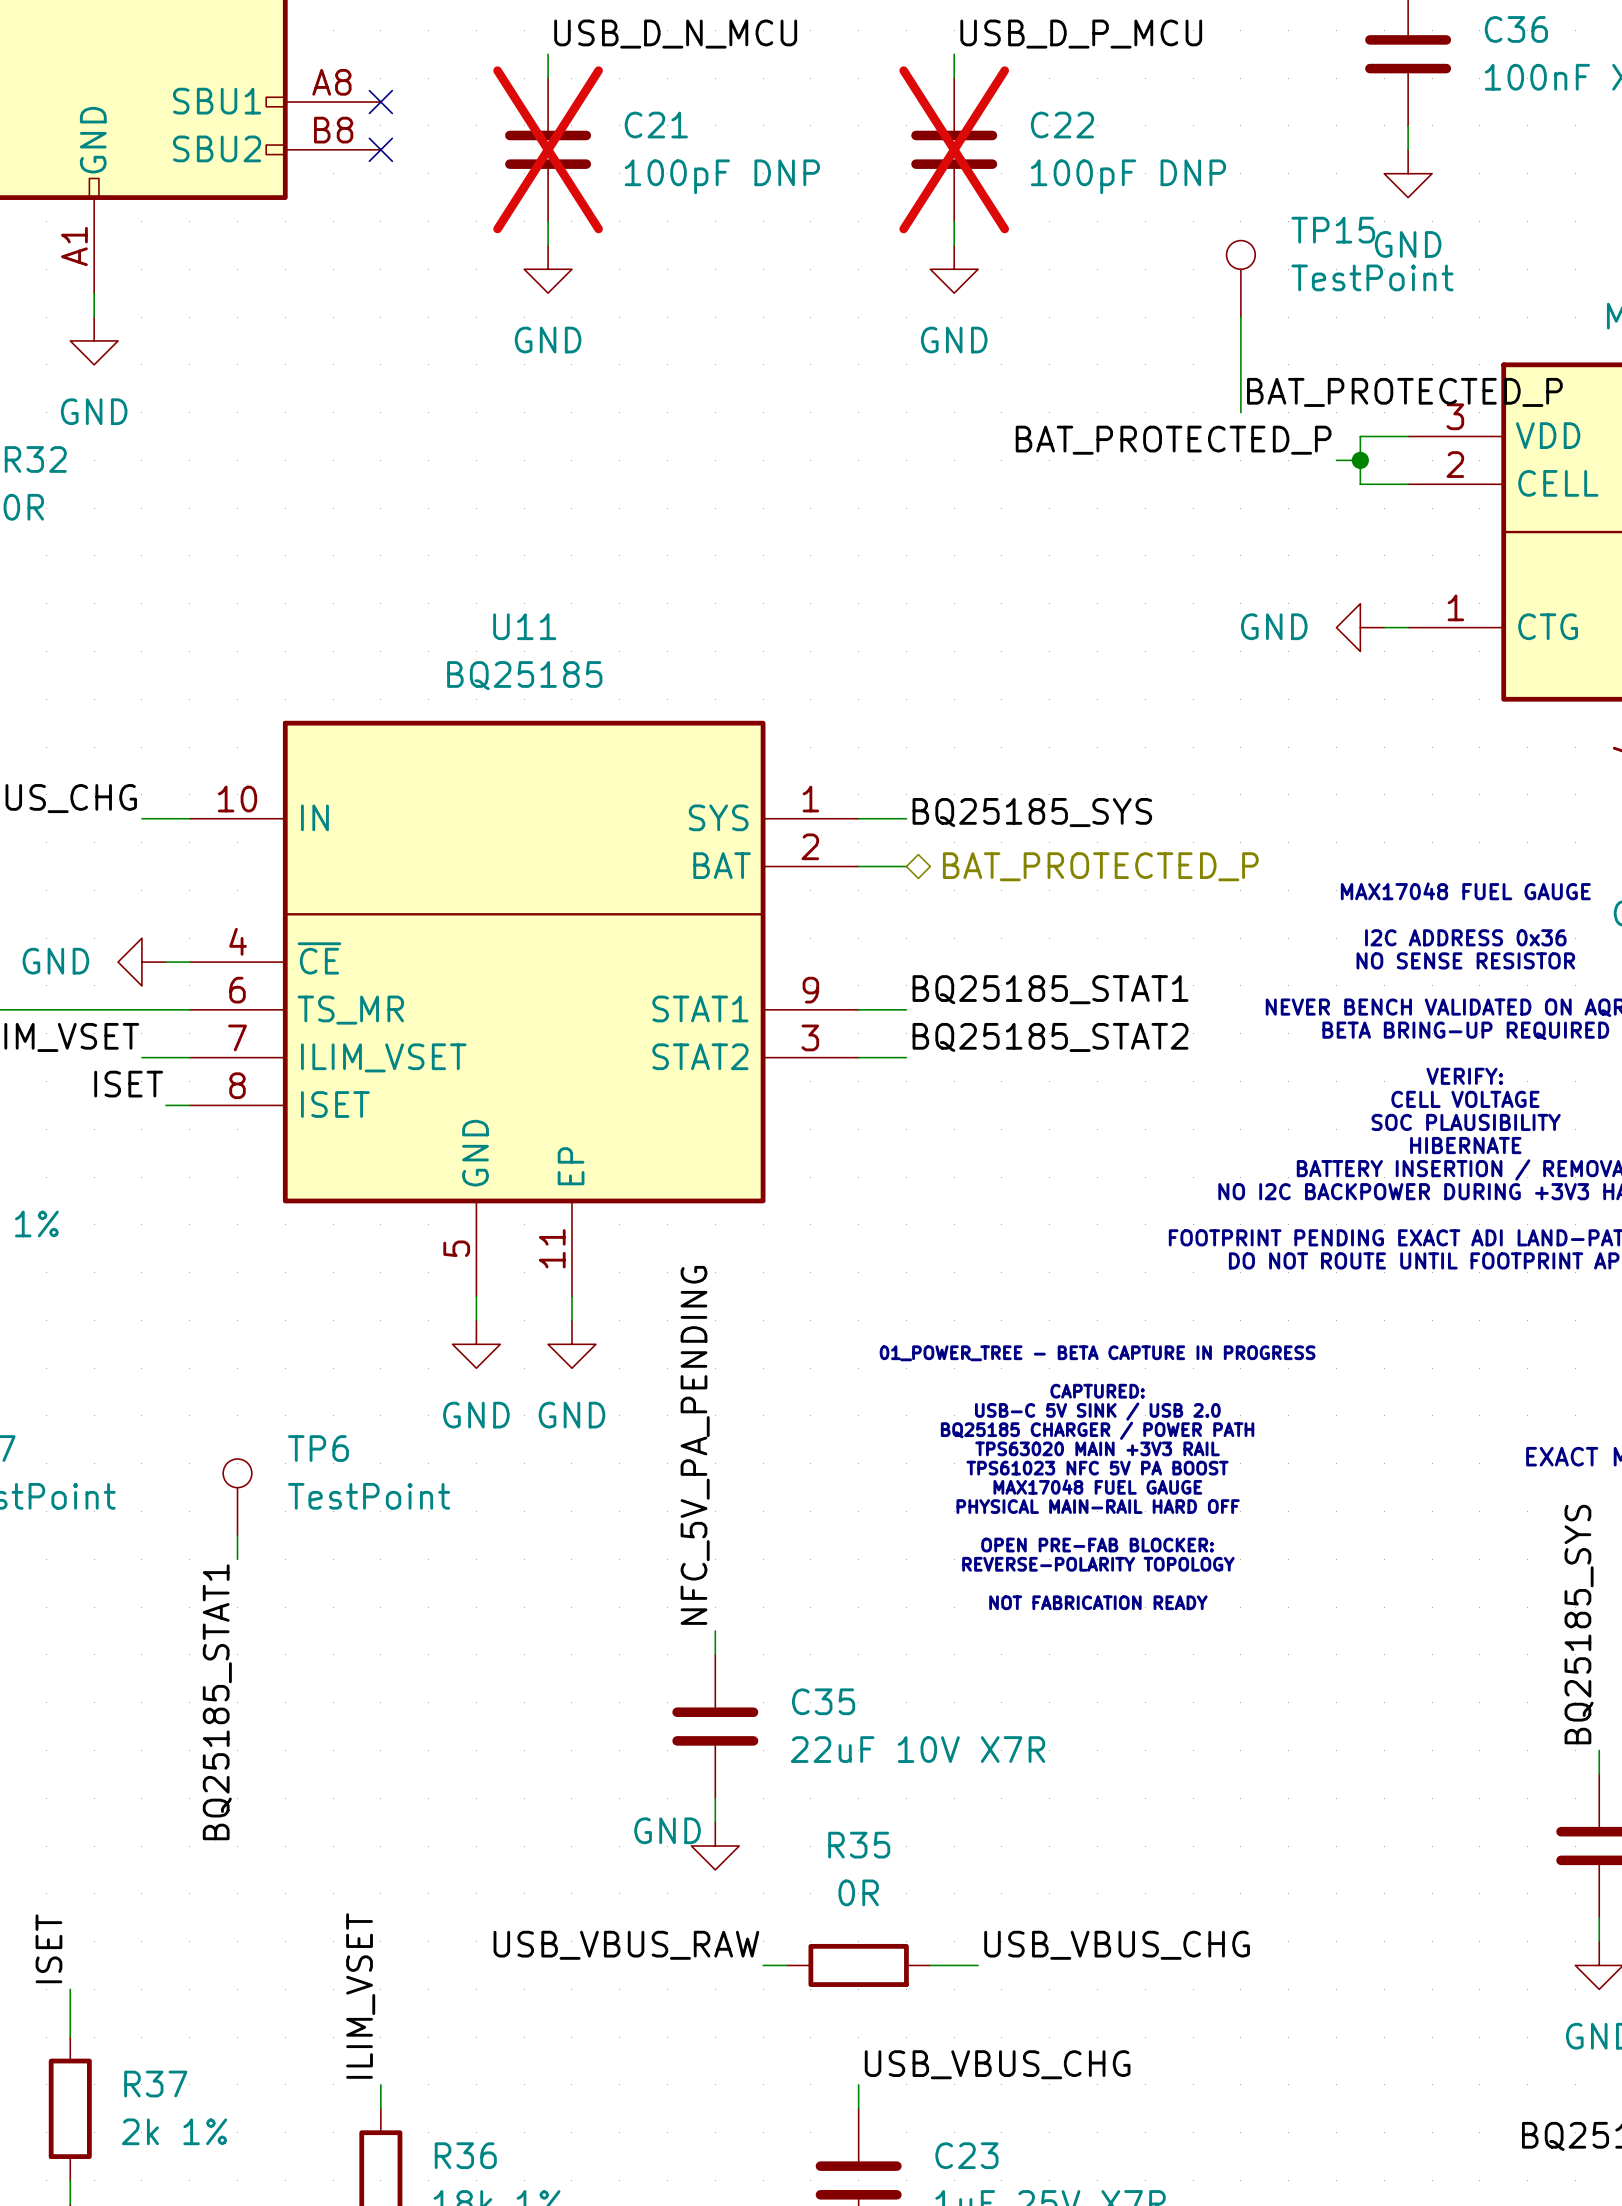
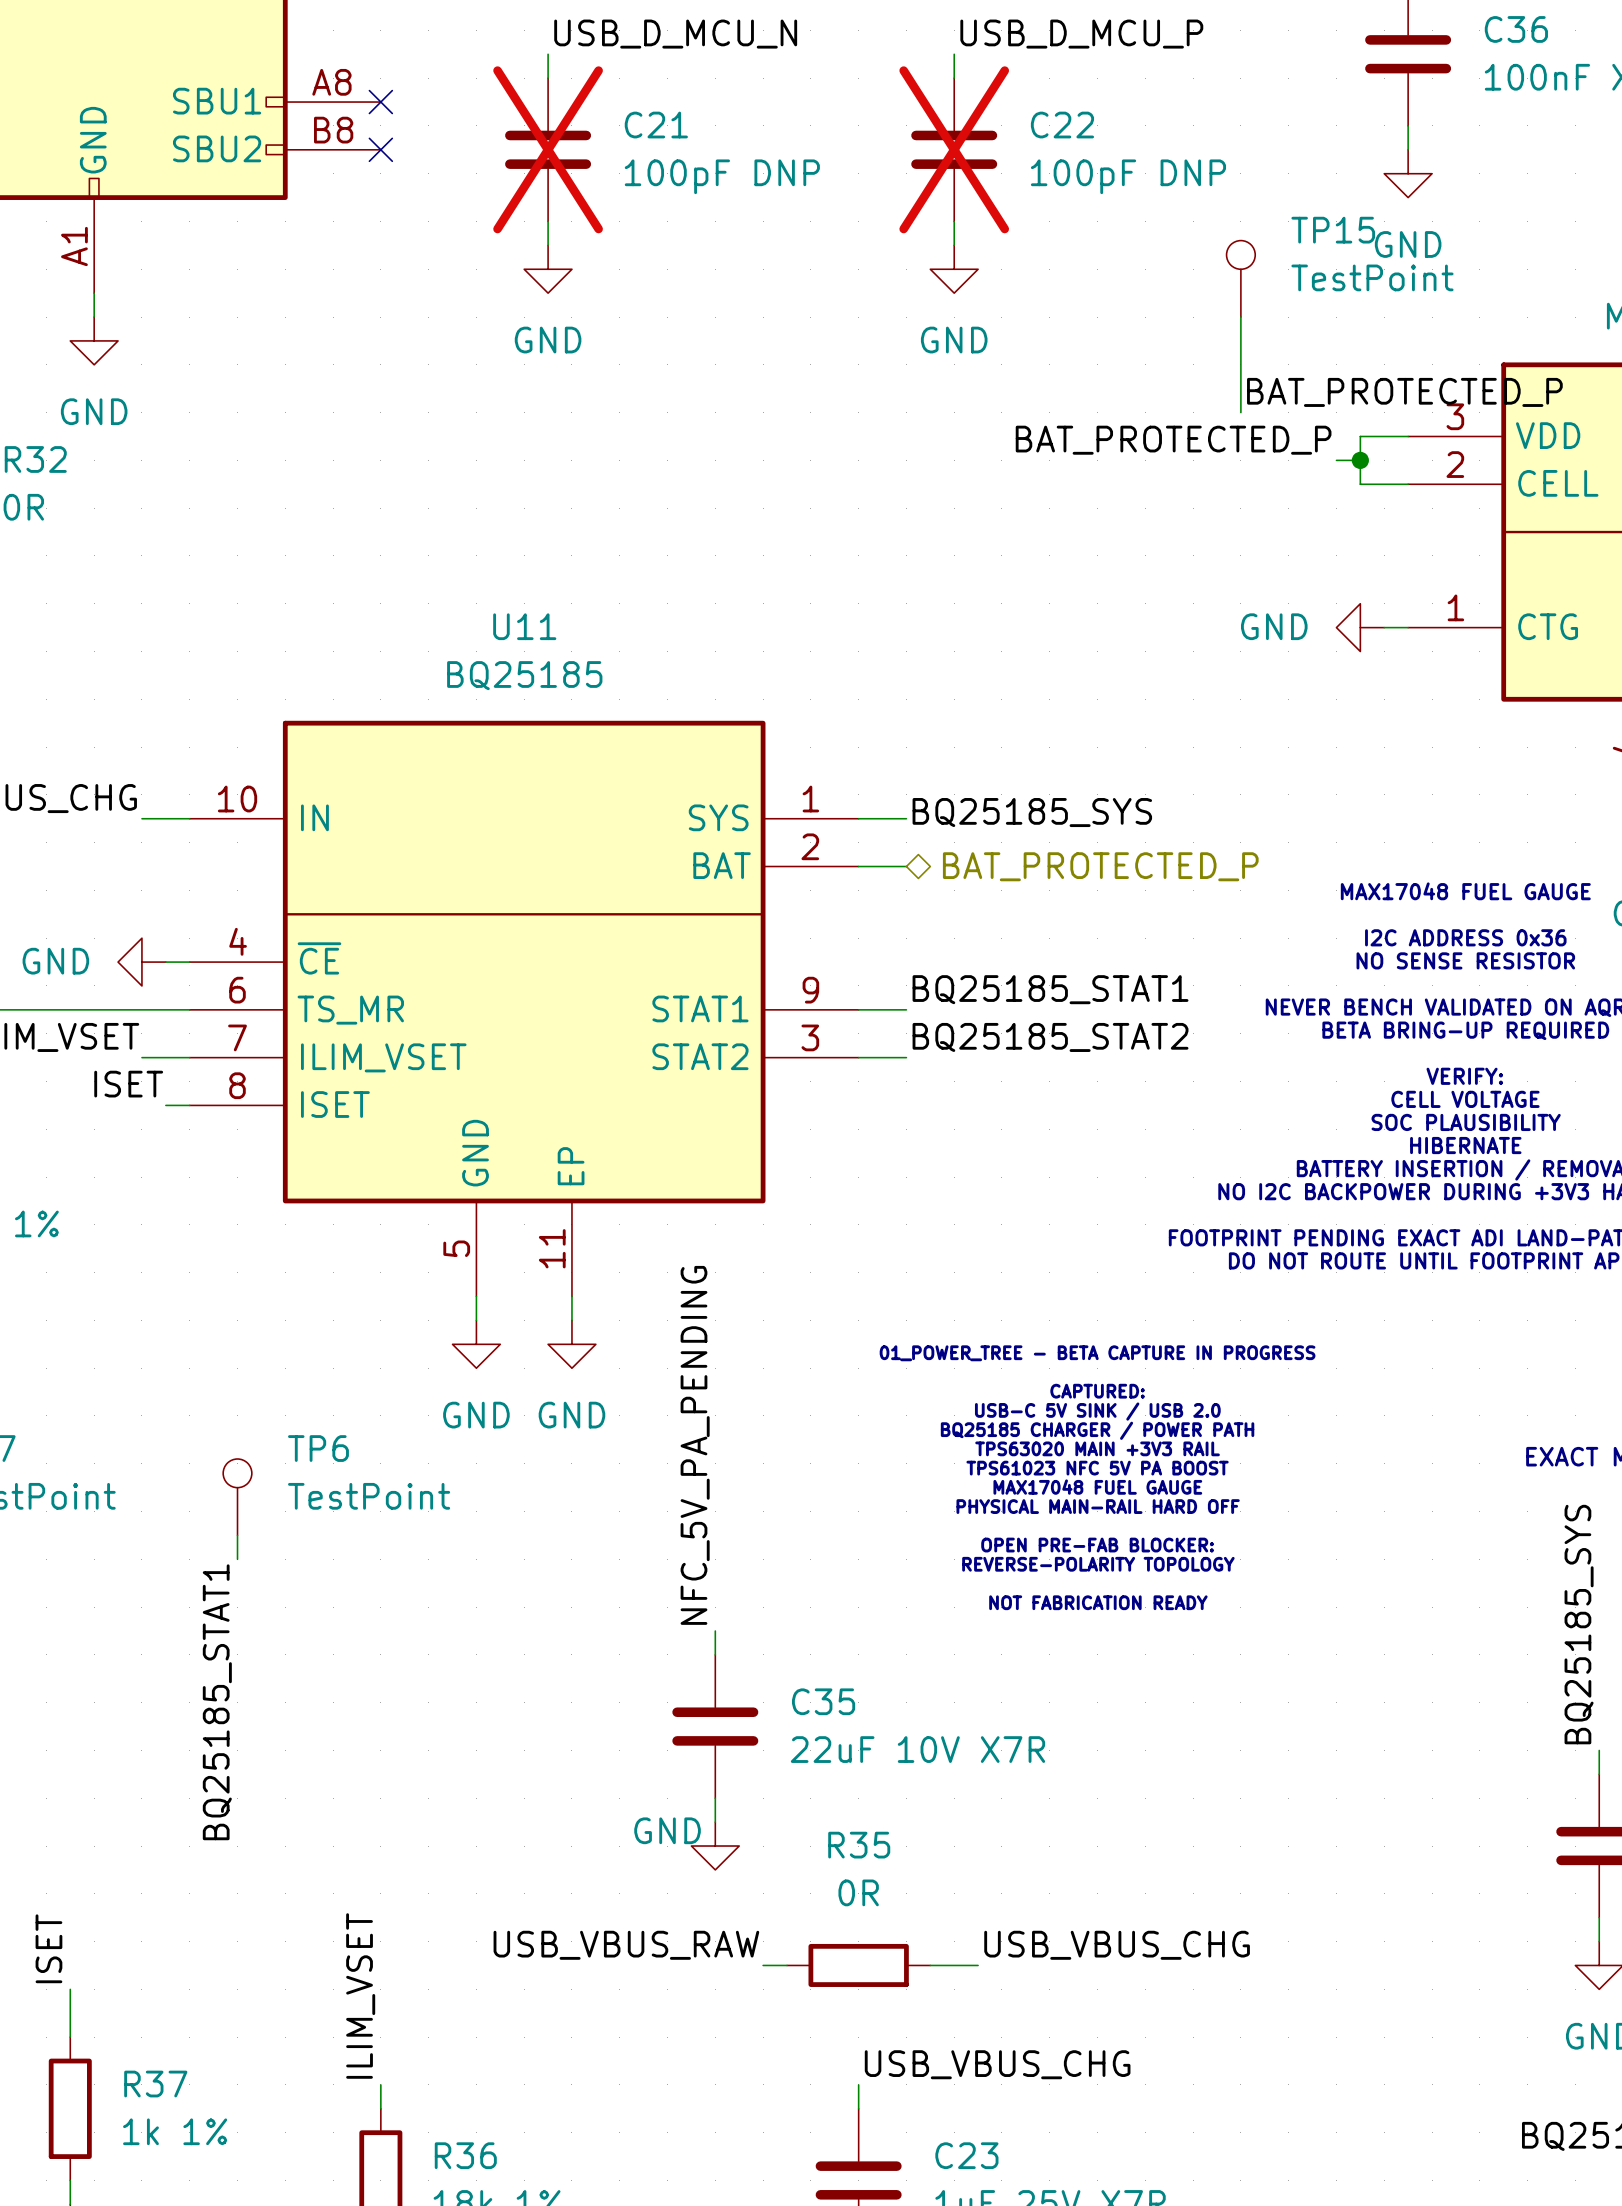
label: USB_D_N_MCU (675, 34) -> USB_D_MCU_N (675, 34)
label: USB_D_P_MCU (1081, 34) -> USB_D_MCU_P (1081, 34)
R37 value: 2k 1% (174, 2131) -> 1k 1% (175, 2131)

